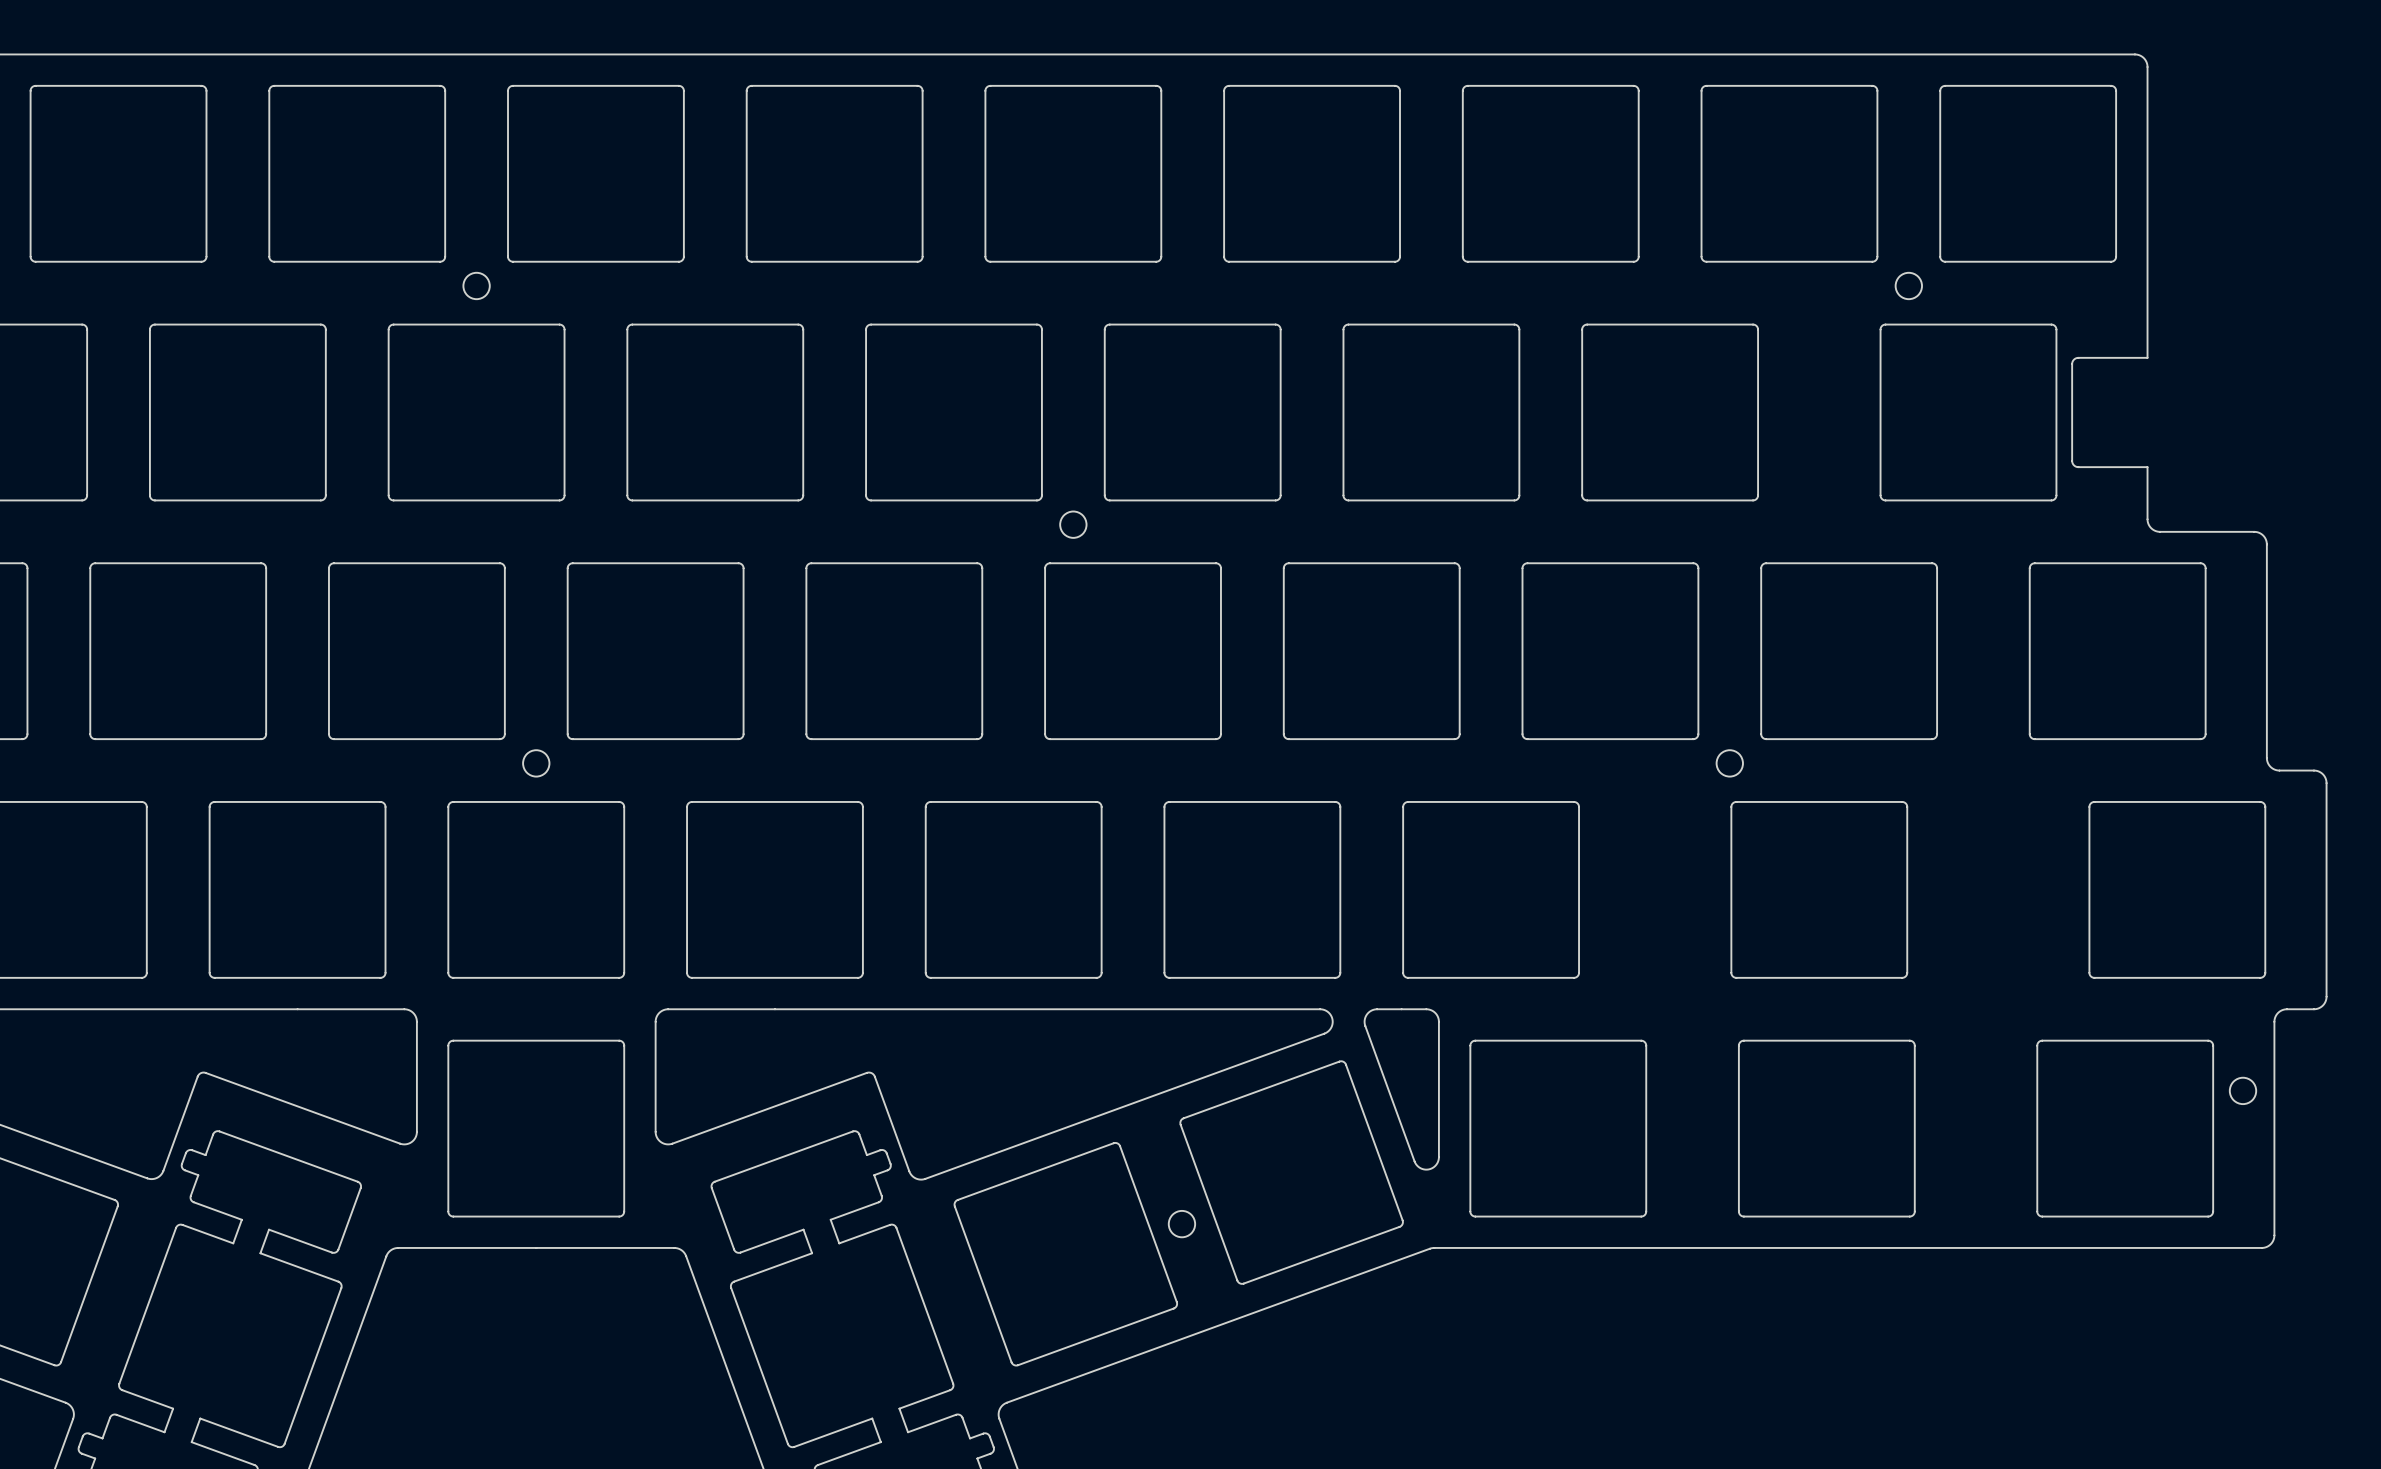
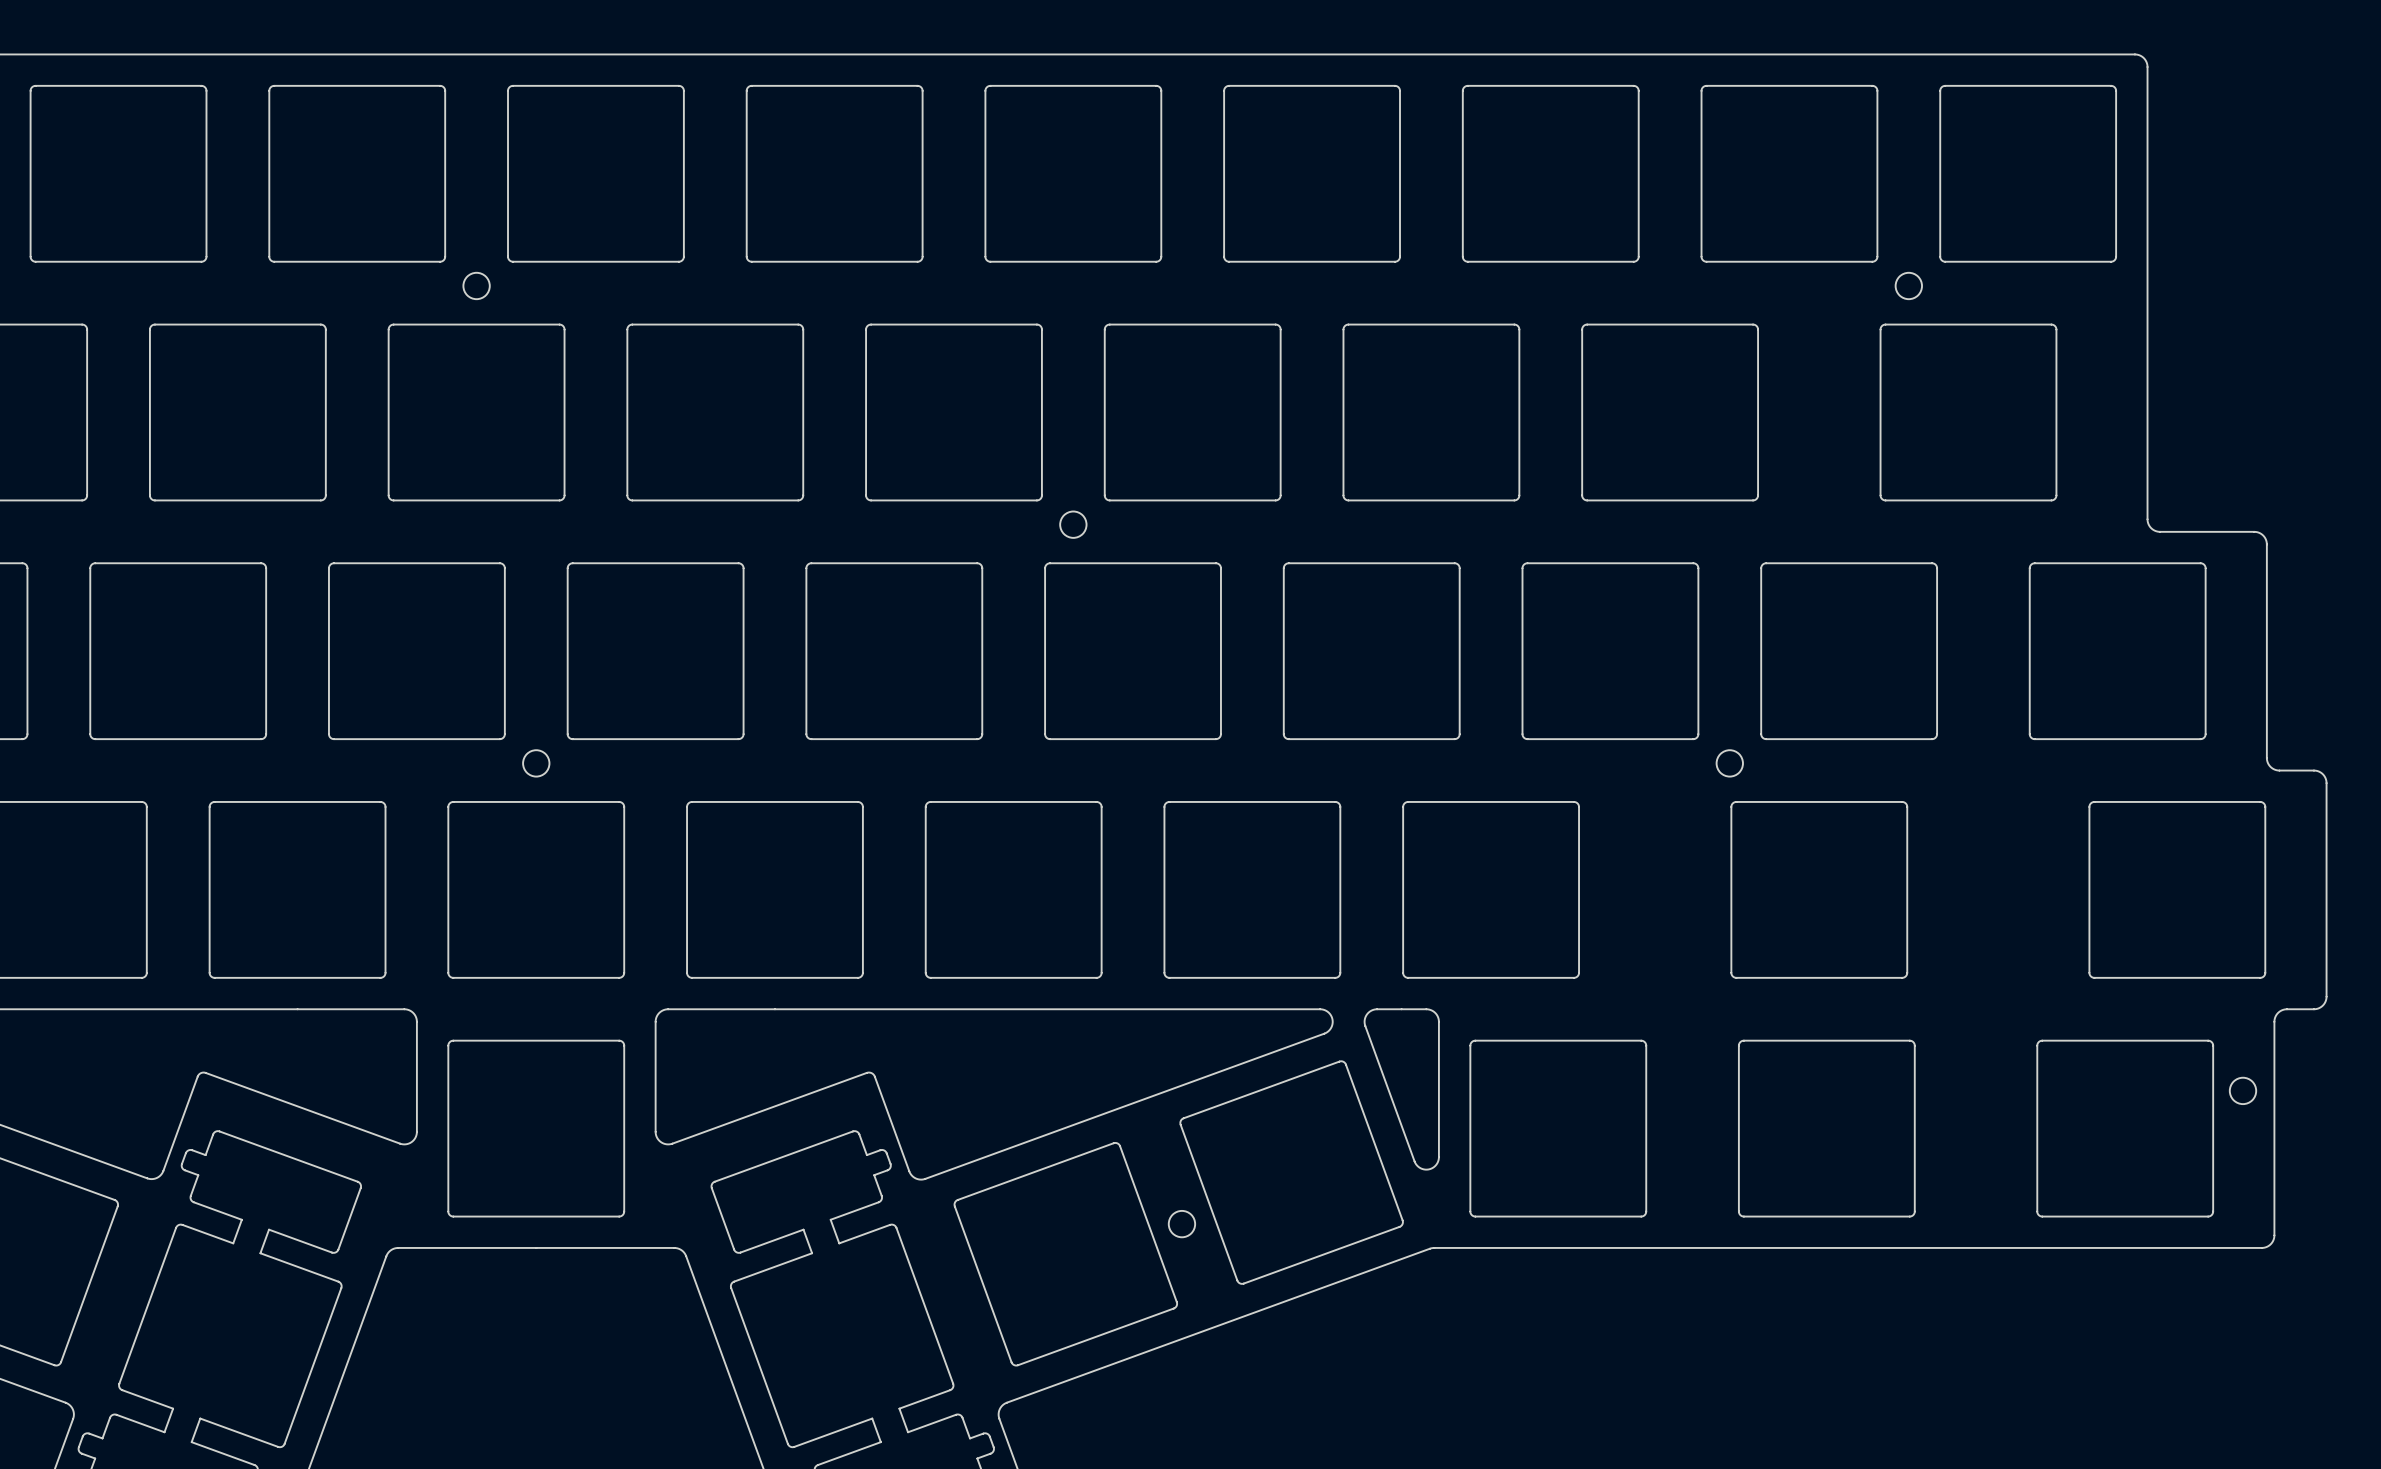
board edge: (2147, 357) (2077, 357) (2073, 360) (2072, 364) (2073, 464) (2078, 467) (2147, 467) -> (2147, 357) (2147, 467)

